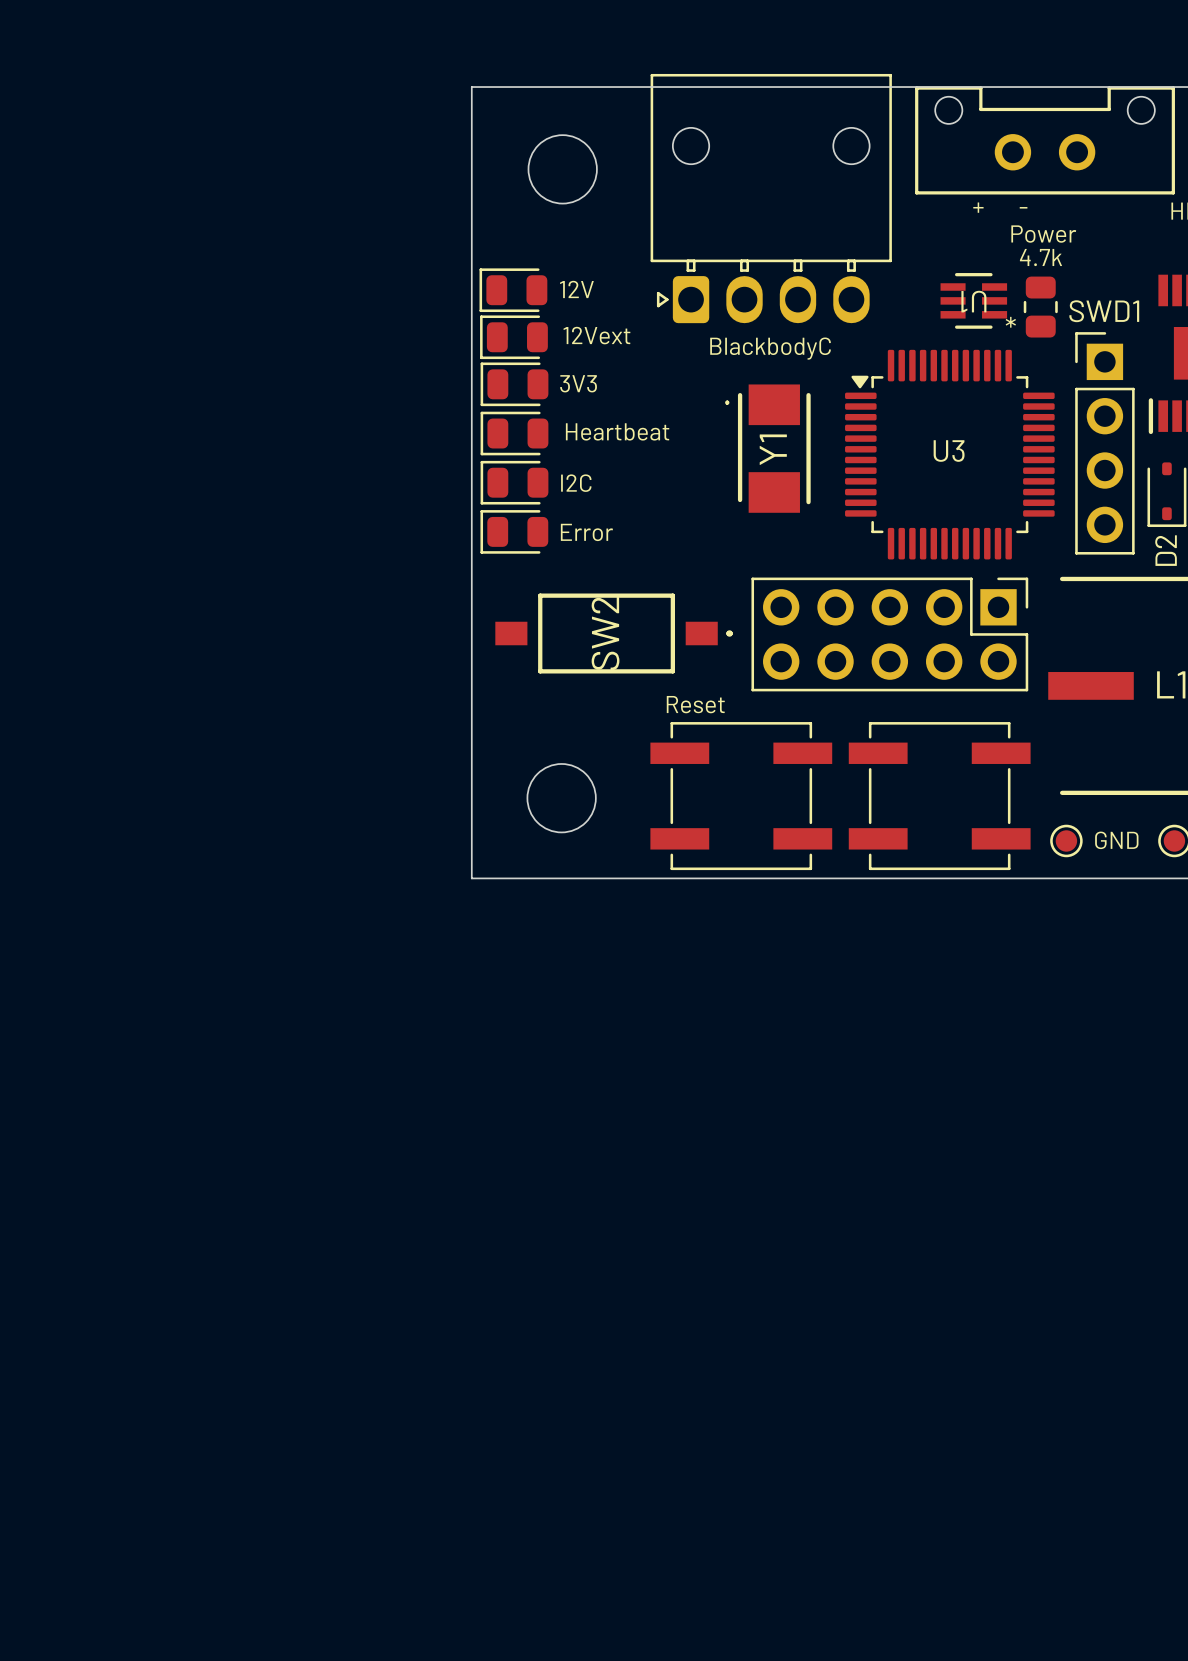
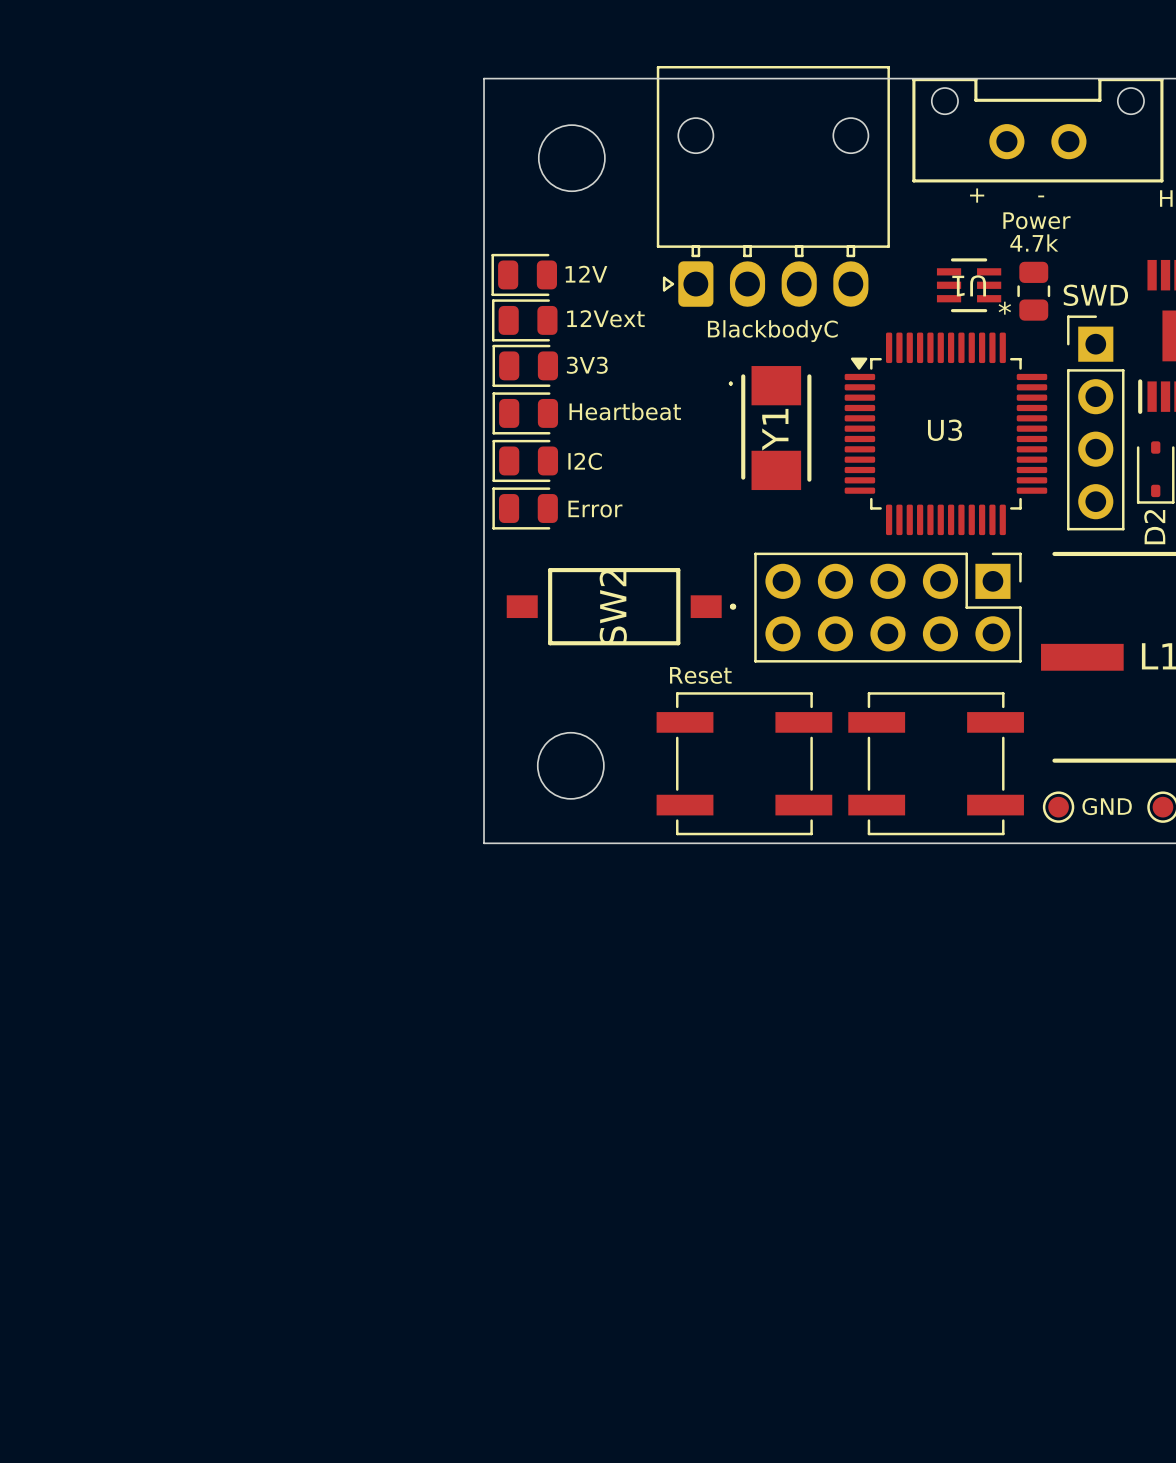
SWD1 name: SWD1 (1104, 311) -> SWD (1095, 295)

